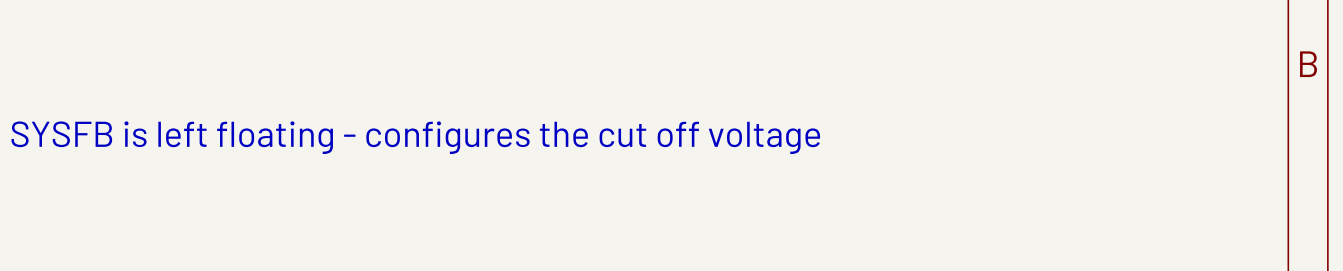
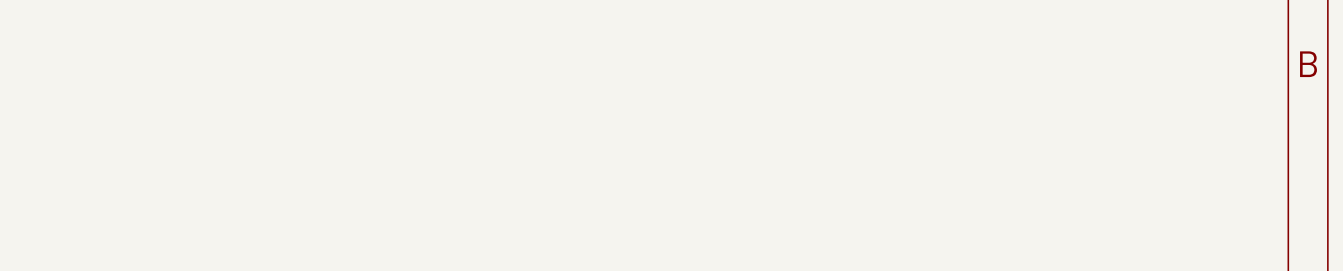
text: SYSFB is left floating - configures the cut off voltage (415, 137) -> none

